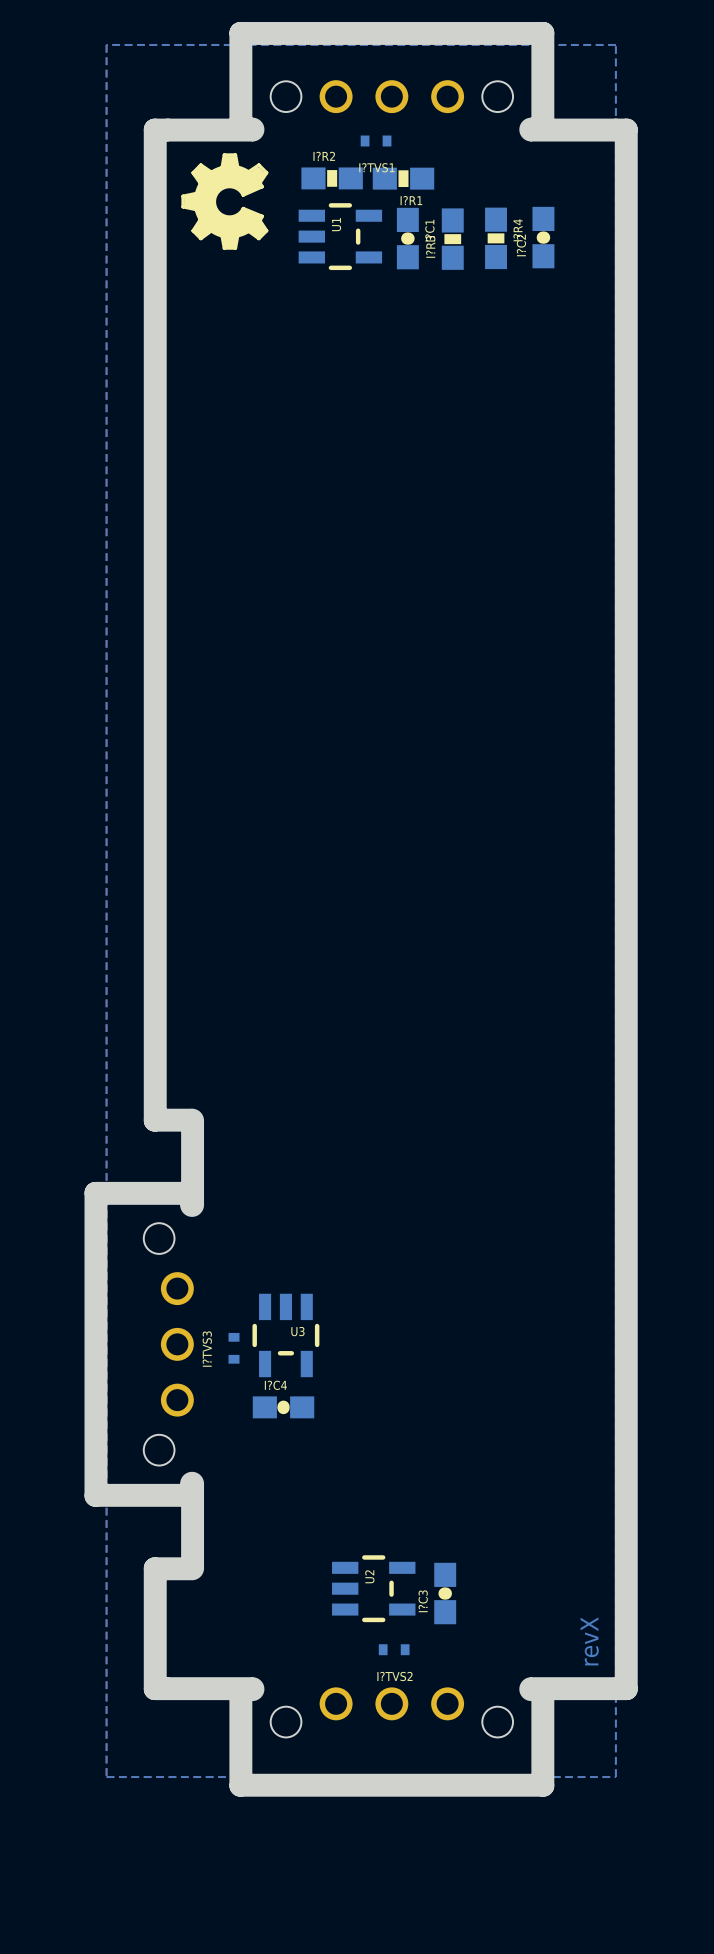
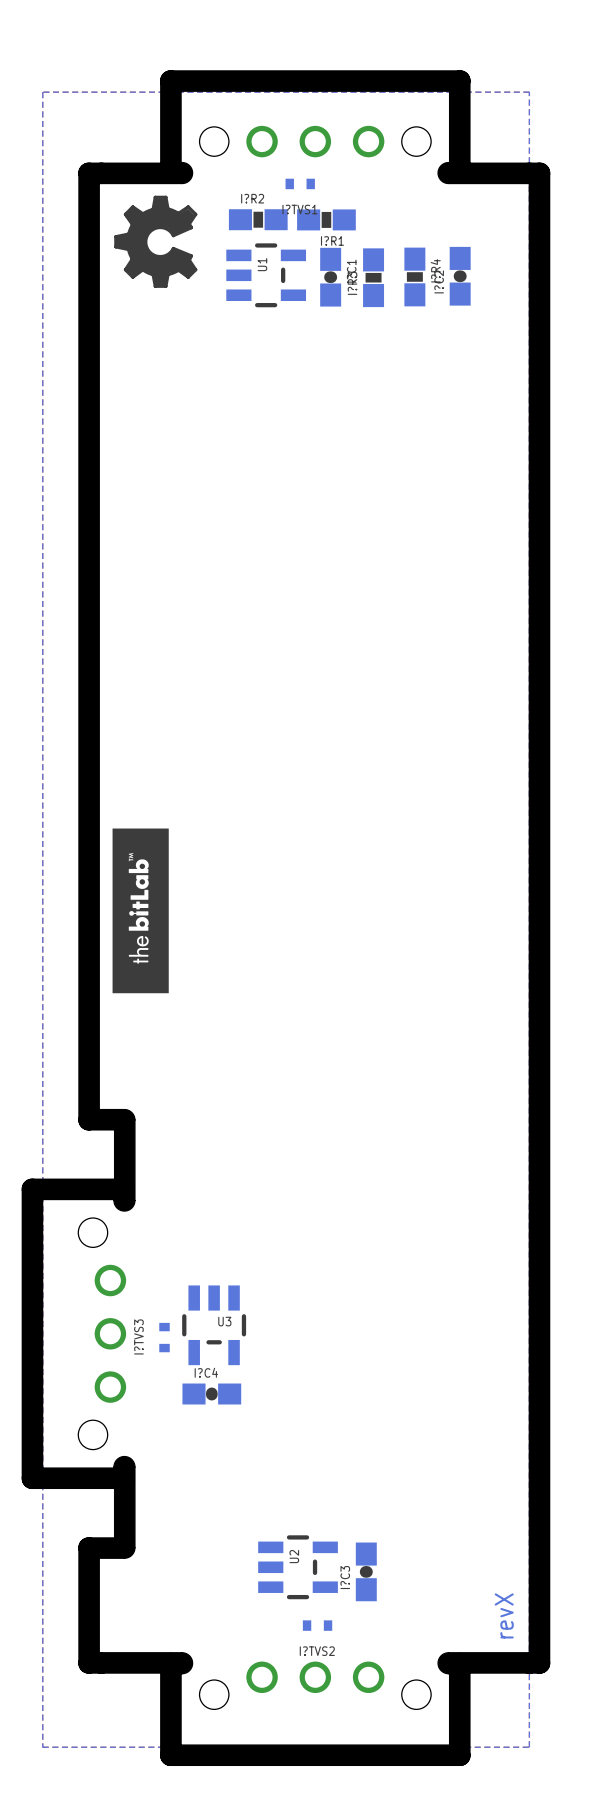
drawing: none -> [112, 828, 169, 994]

